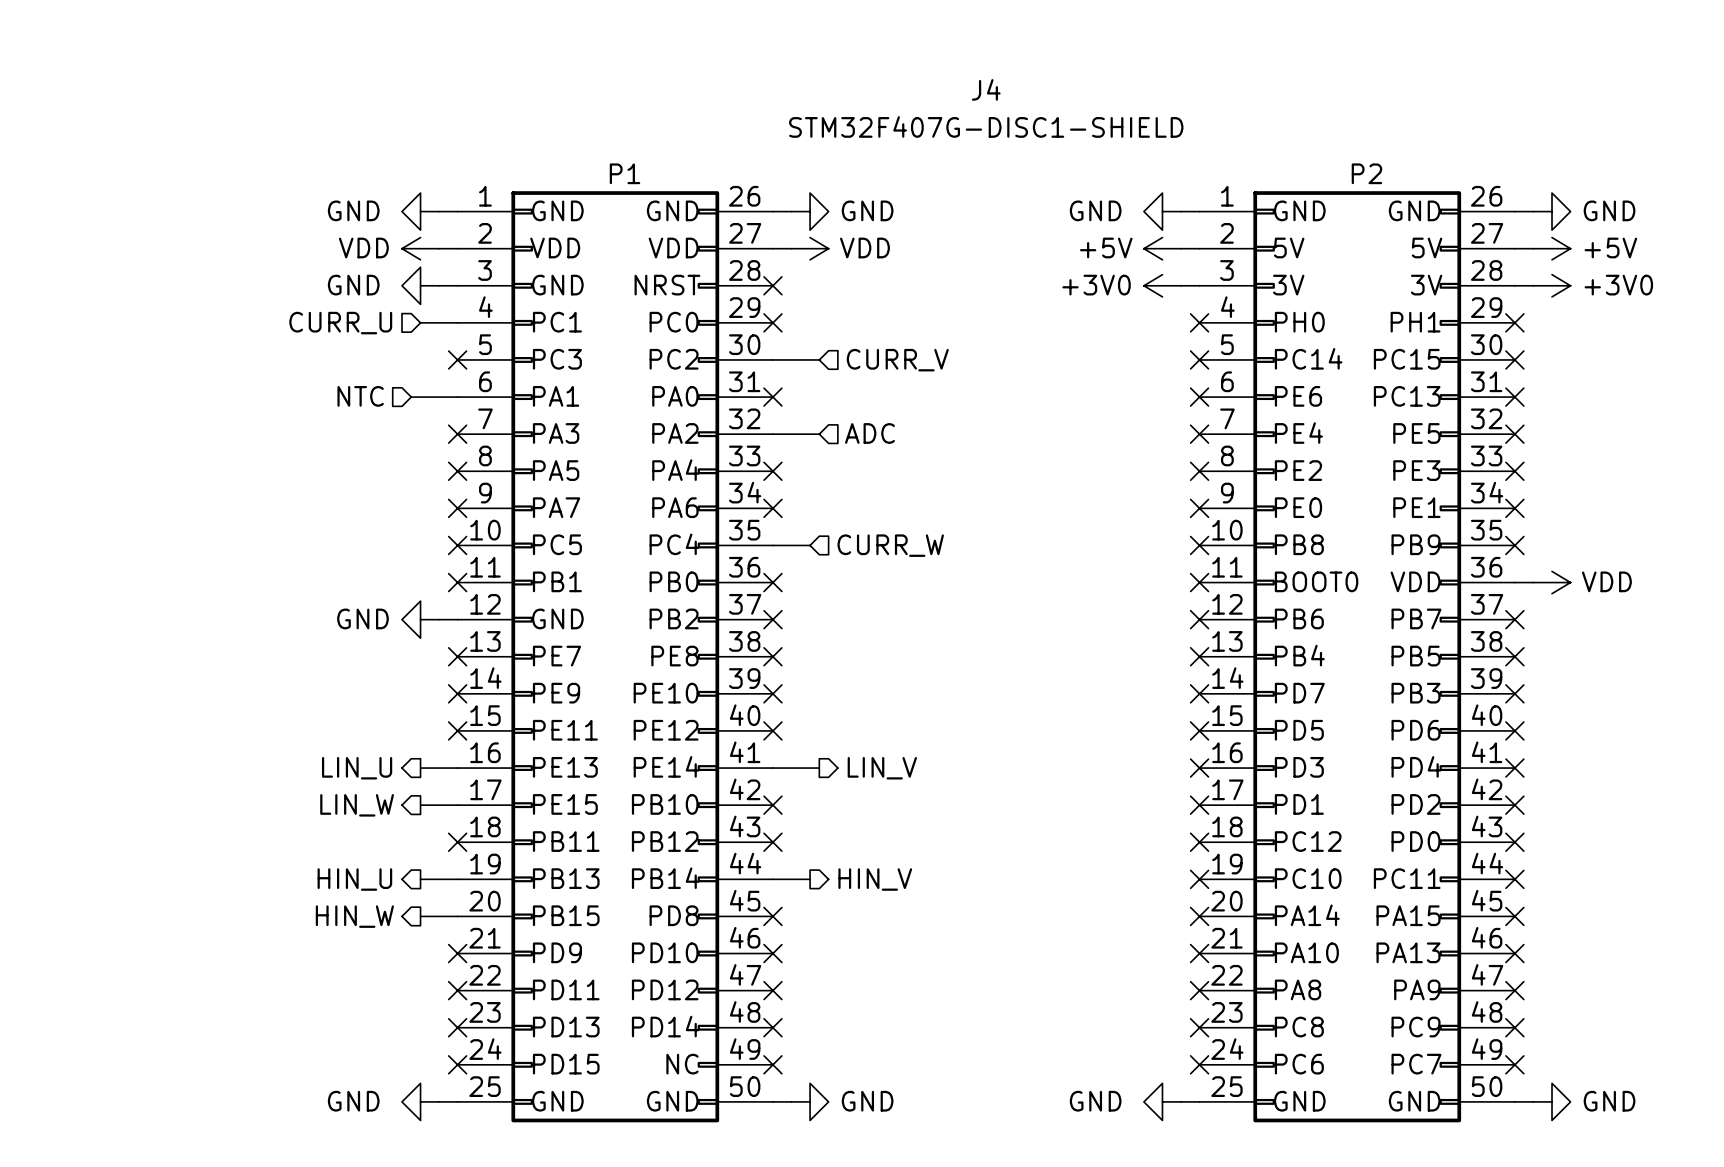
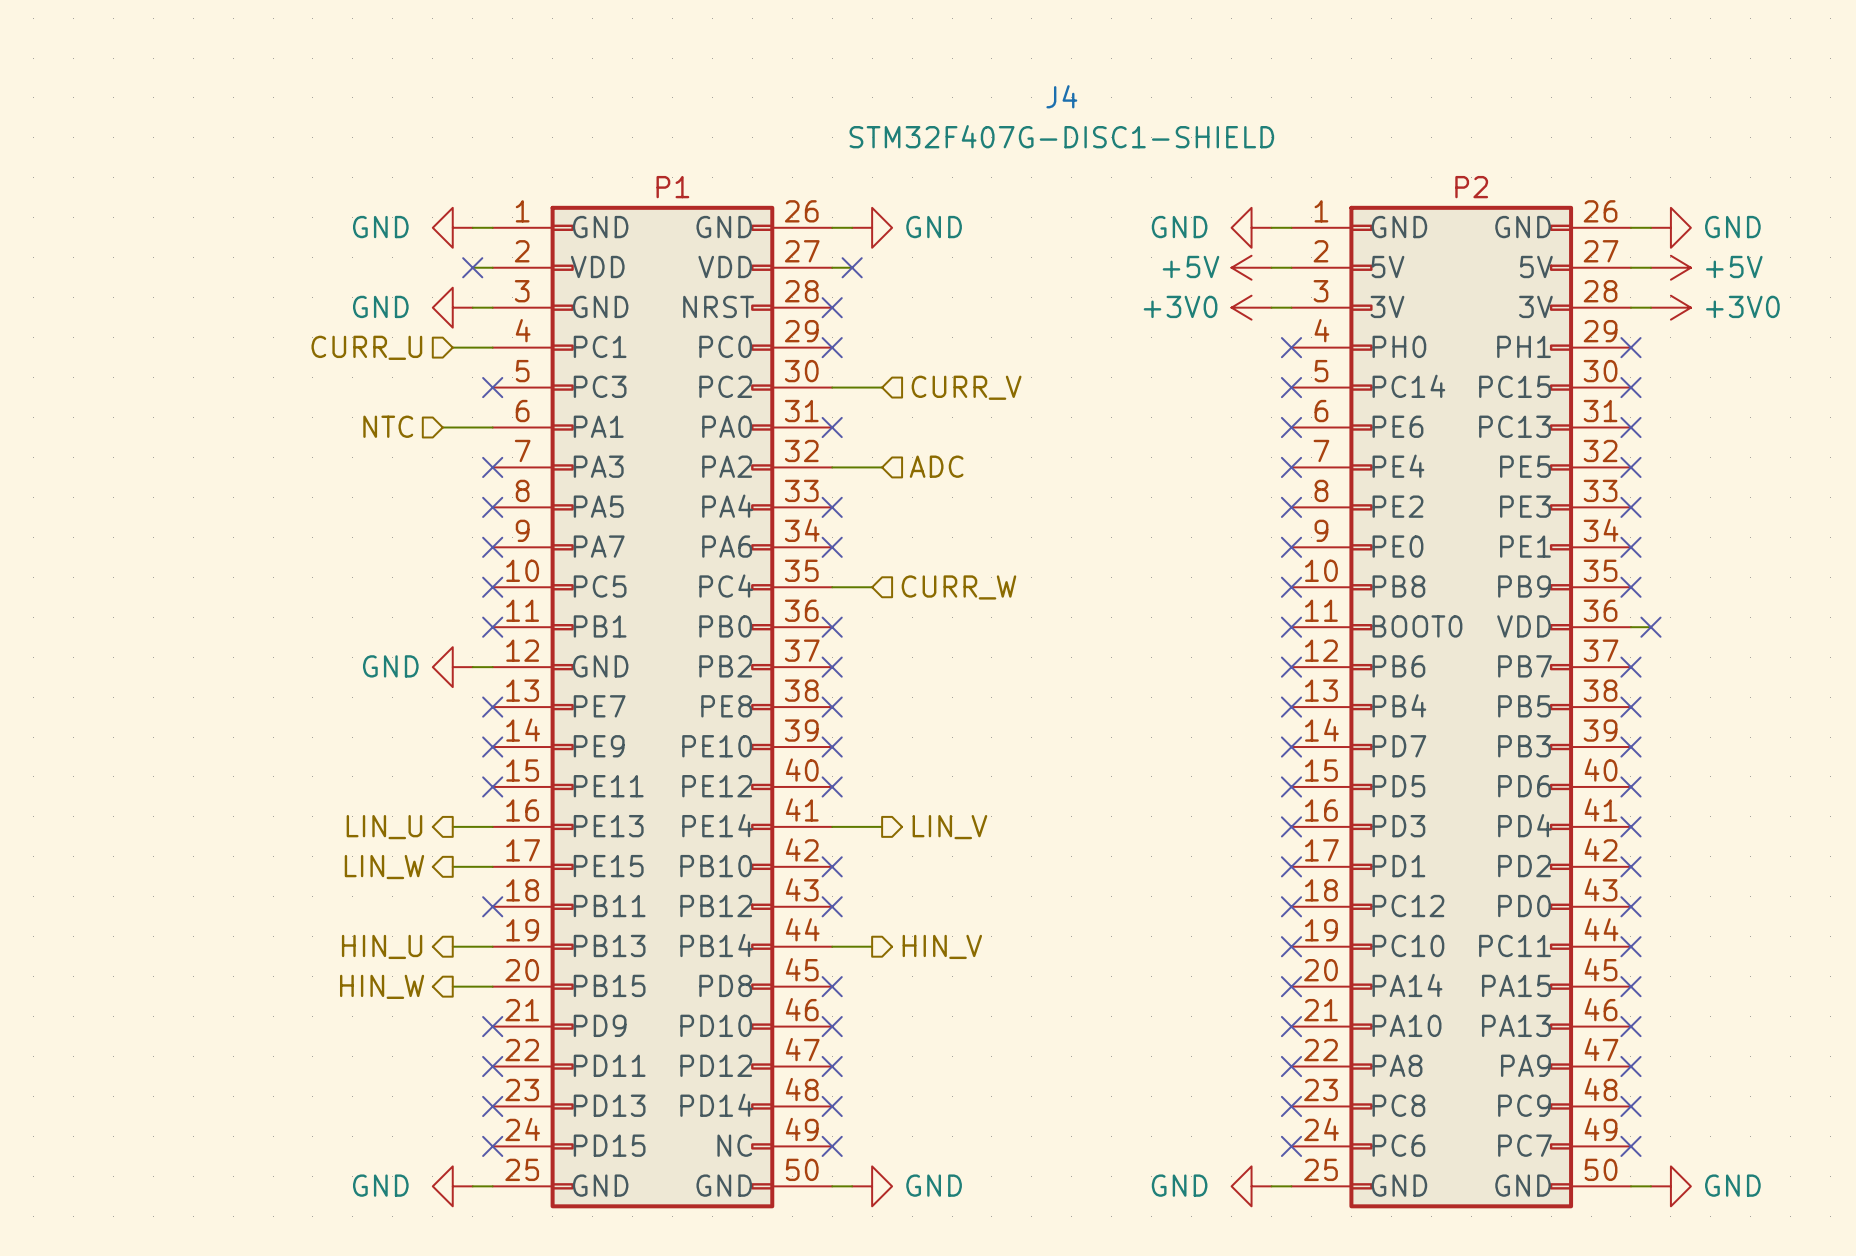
power symbol: VDD (420, 248) -> none
no-connect mark: none -> (472, 267)
no-connect mark: none -> (852, 267)
power symbol: VDD (810, 248) -> none
no-connect mark: none -> (1650, 627)
power symbol: VDD (1552, 582) -> none

